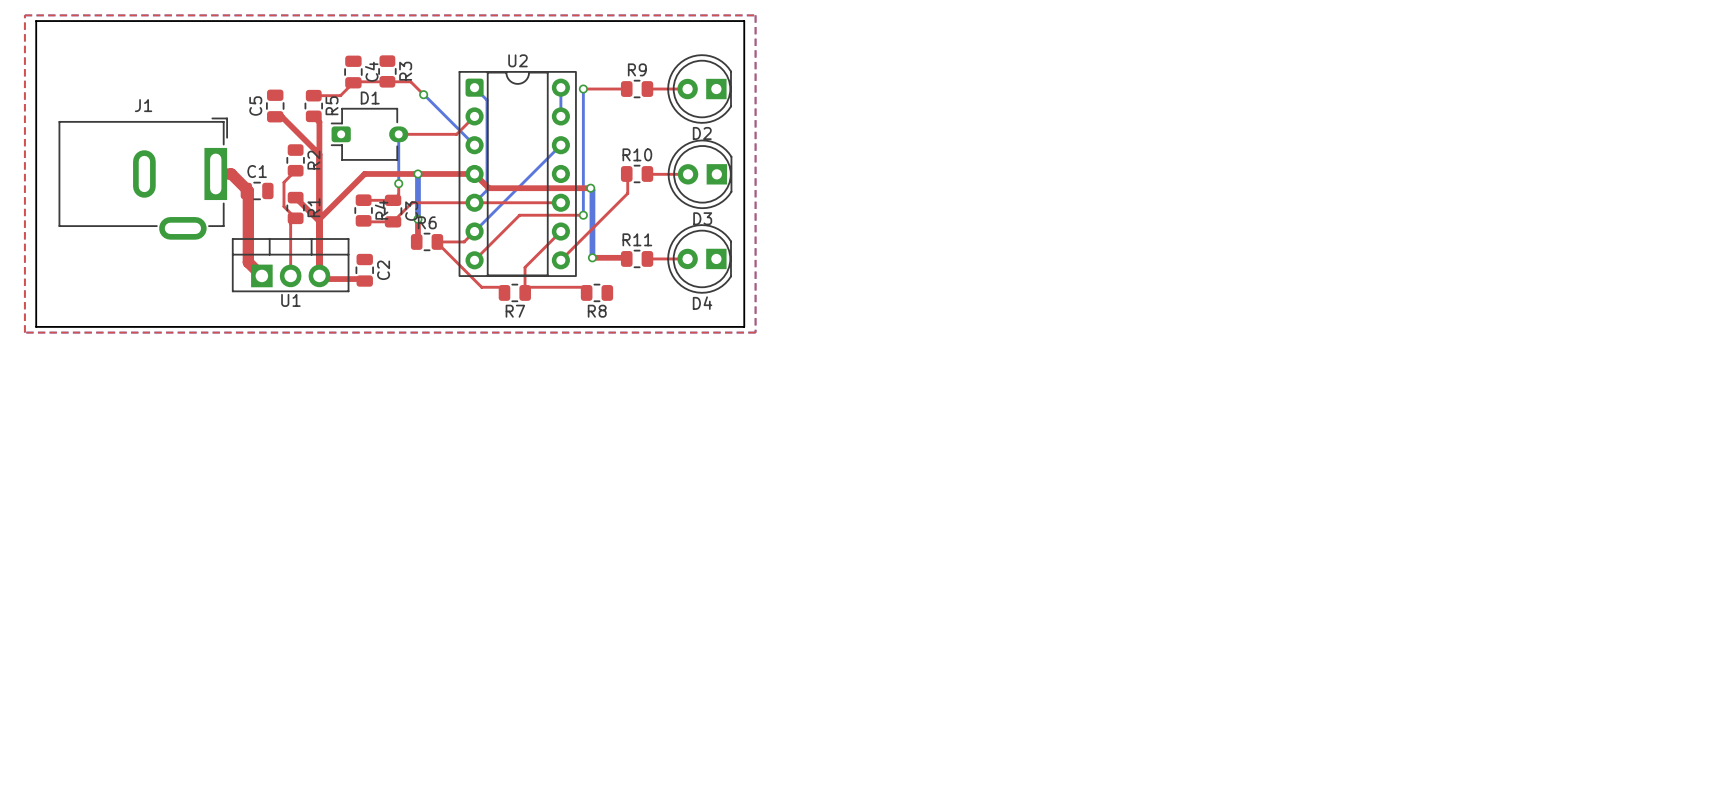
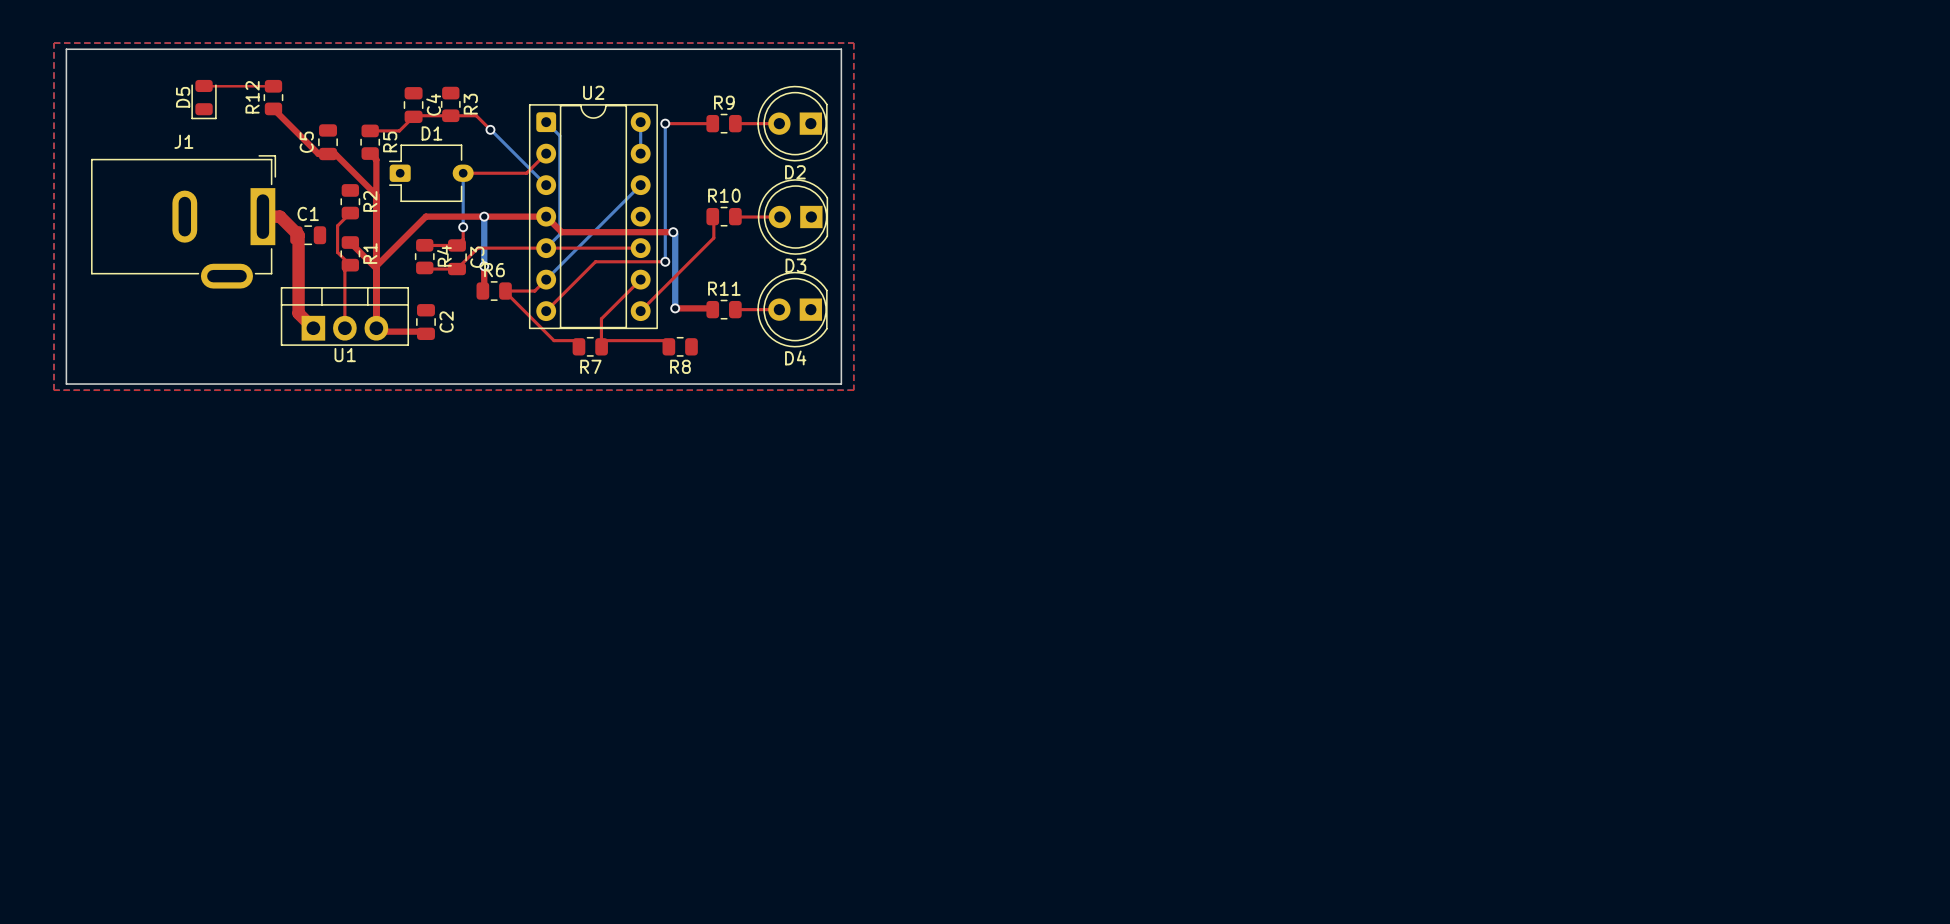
top track: none -> (204, 85) (273, 86)
R12: none -> (273, 97)
D5: none -> (204, 99)
top track: none -> (273, 108) (318, 154) (328, 154)

